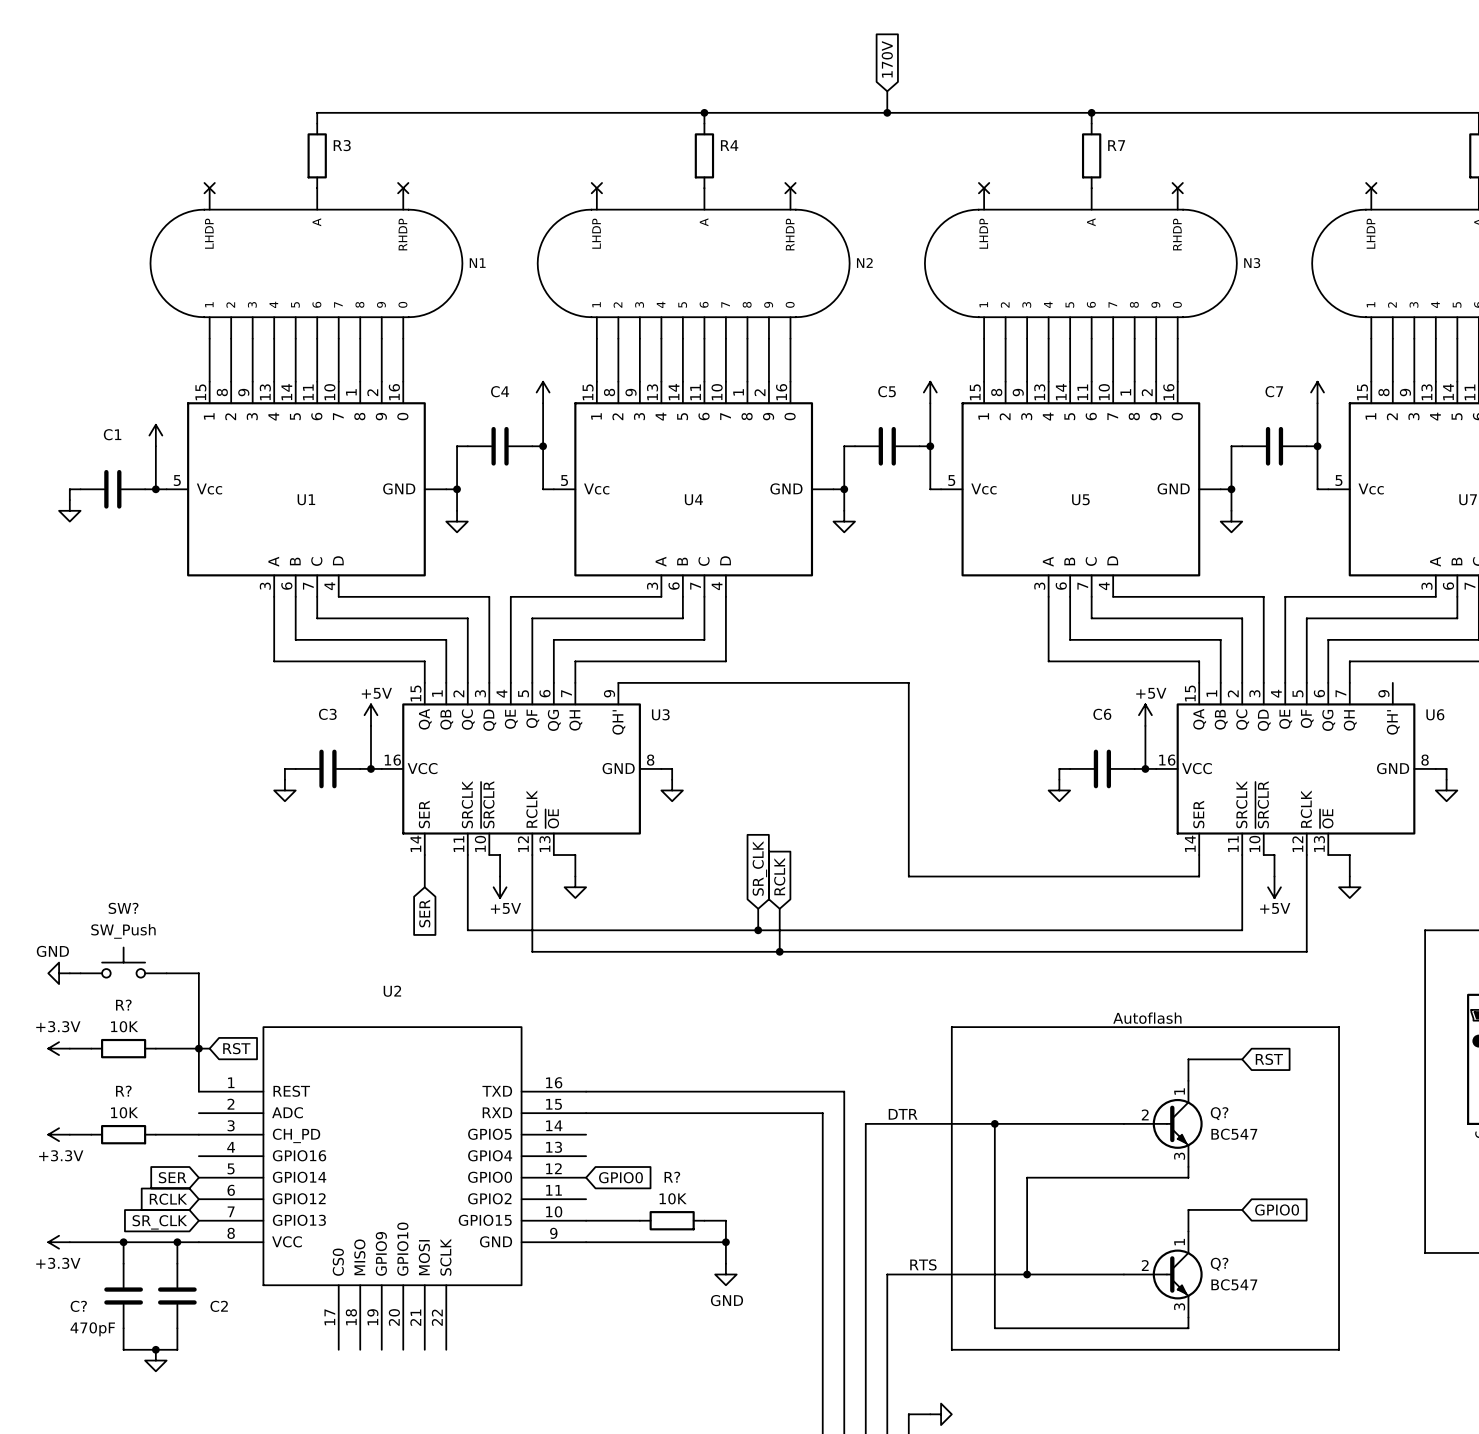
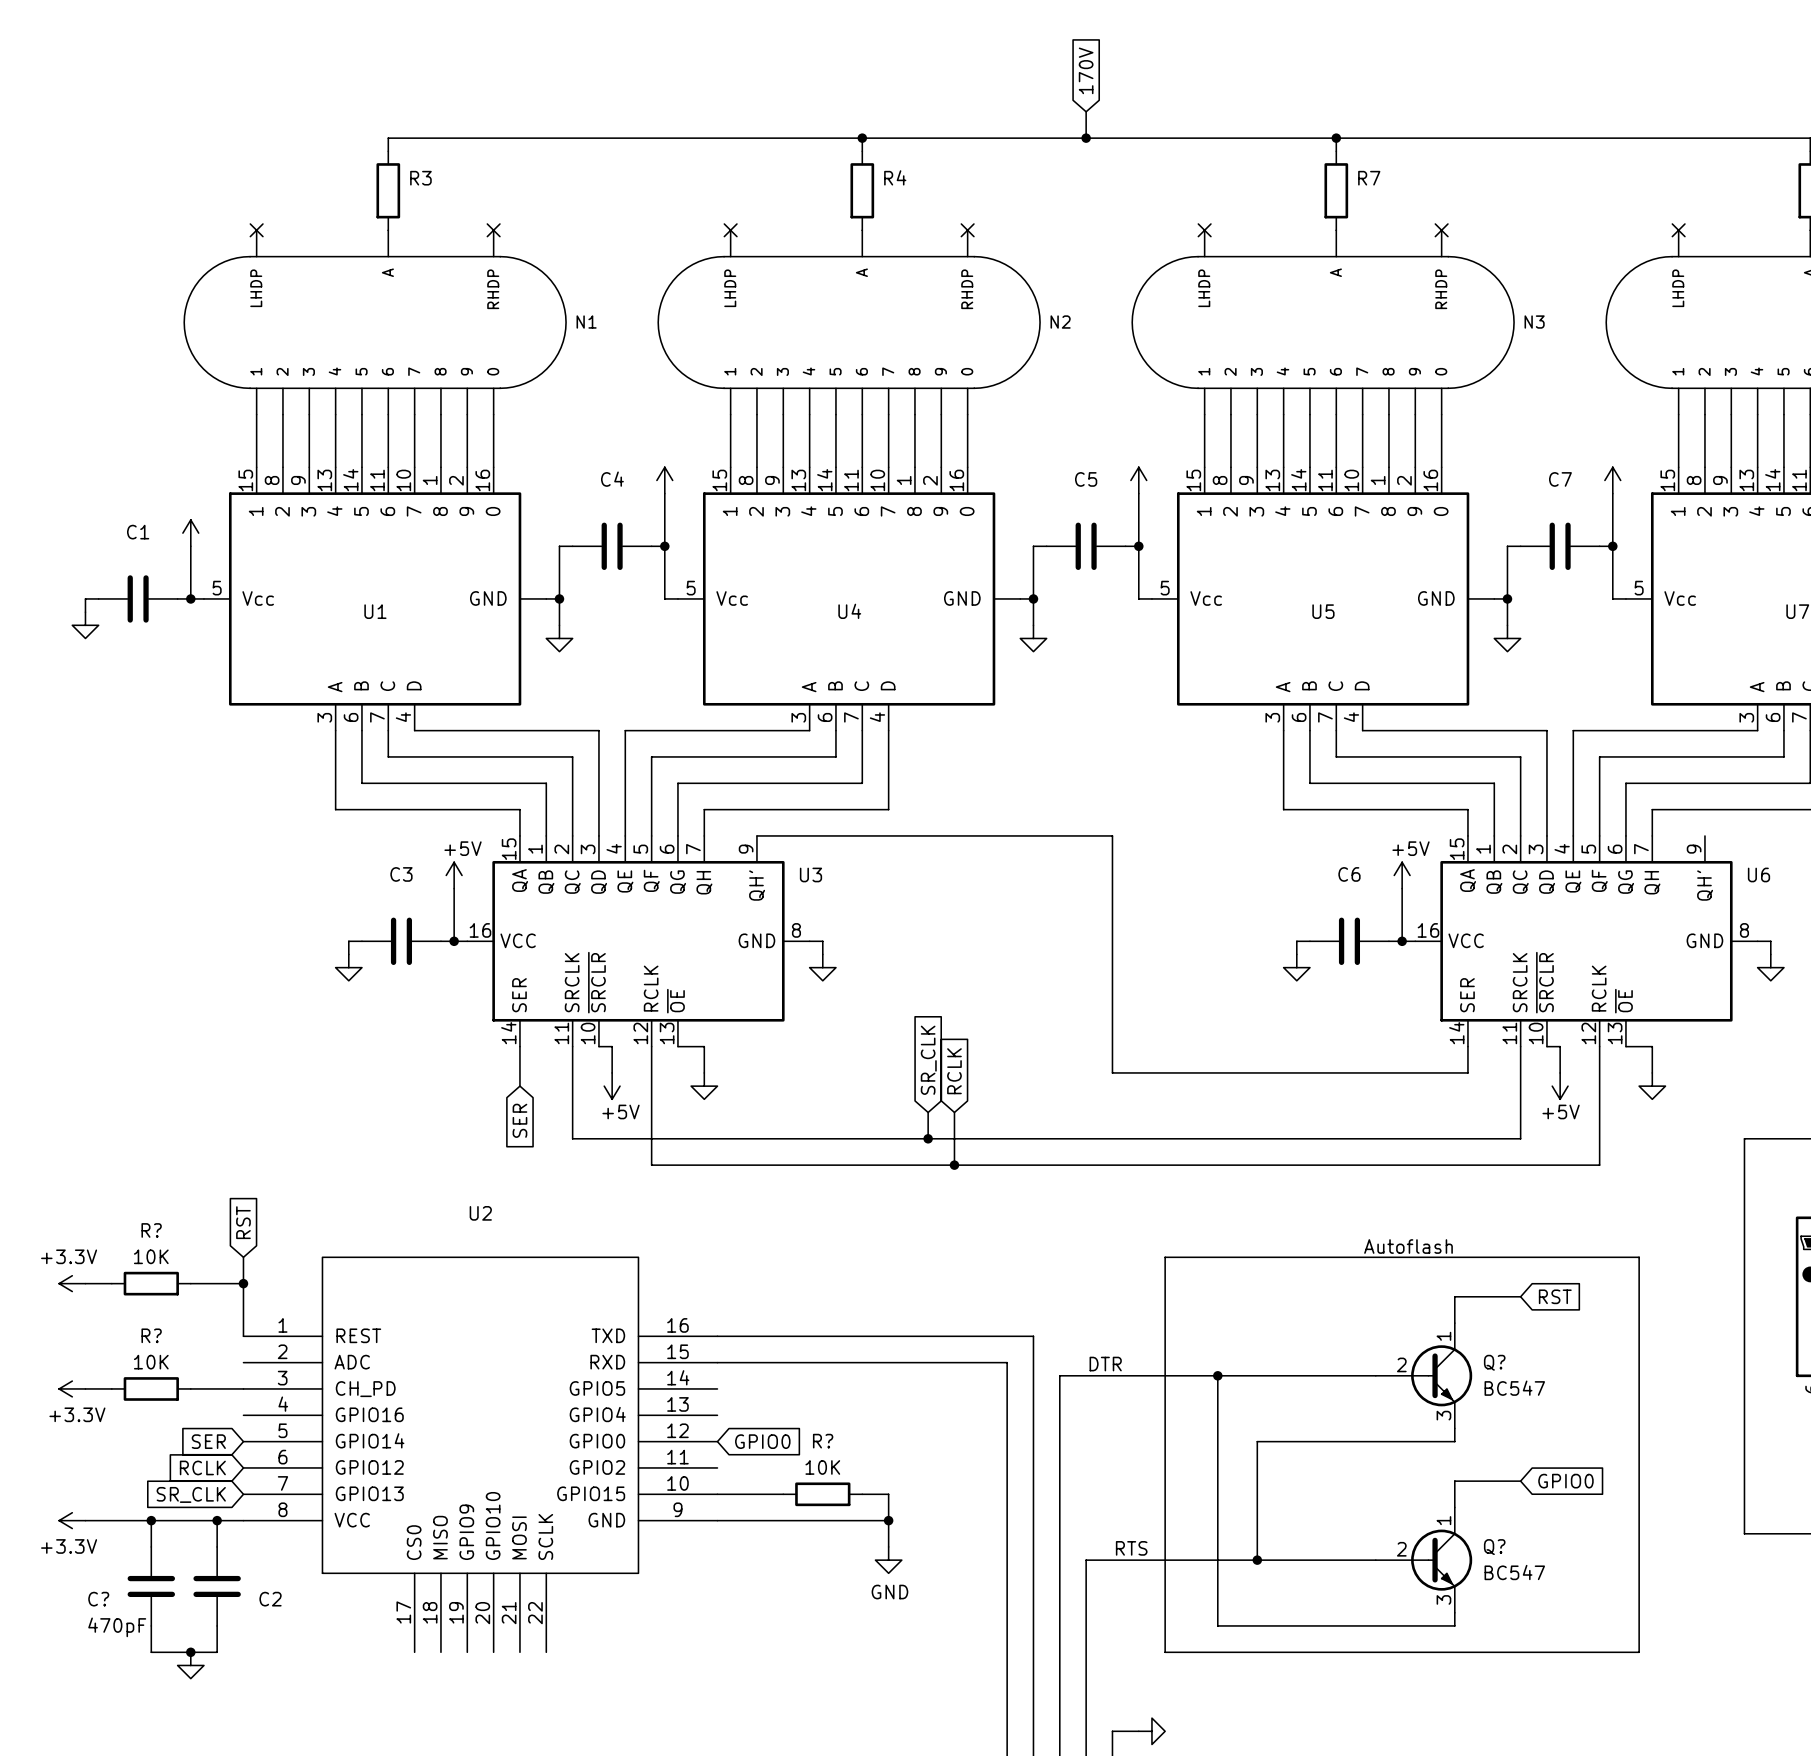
SW?: SW_Push (123, 962) -> none
power symbol: GND (59, 973) -> none
wire: (69, 973) (80, 973) -> none
wire: (166, 973) (198, 973) (198, 1027) -> none
wire: (198, 1048) (209, 1048) -> none
global label rotation: 0° (236, 1048) -> 90° counterclockwise (243, 1222)
global label position: RST (236, 1048) -> RST (243, 1222)

